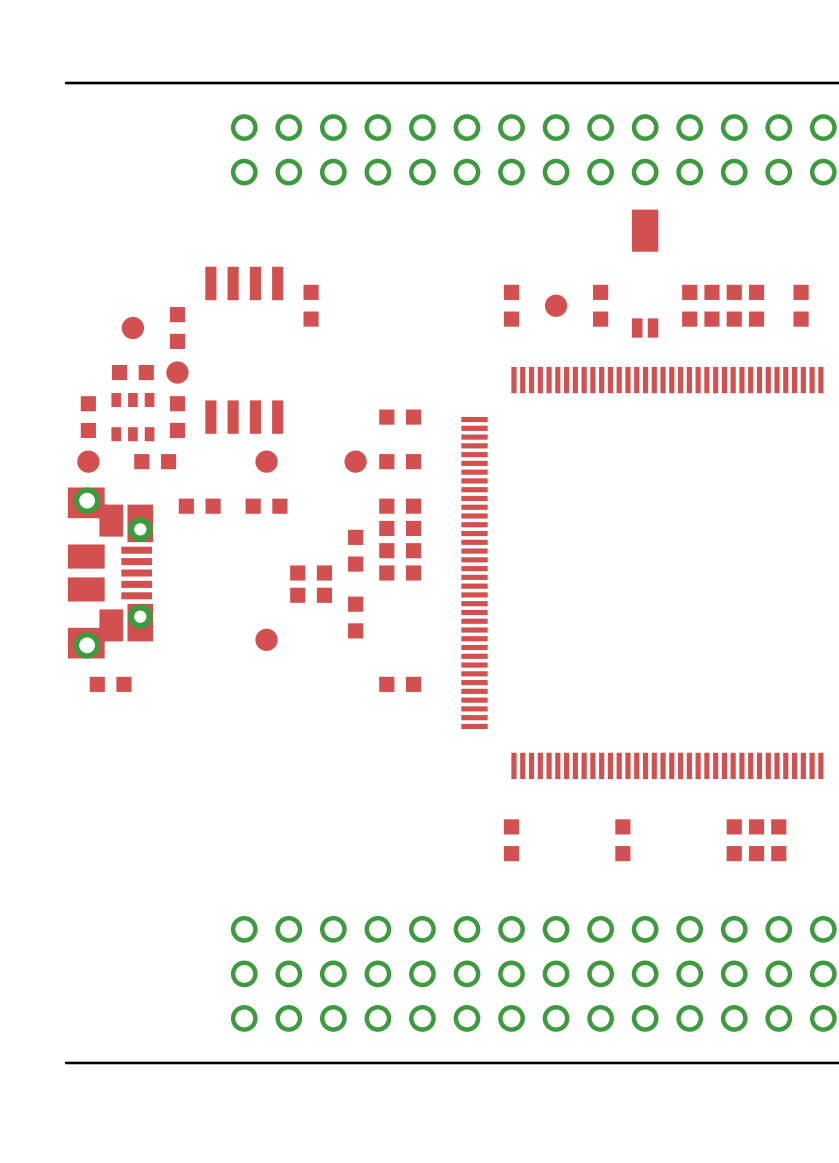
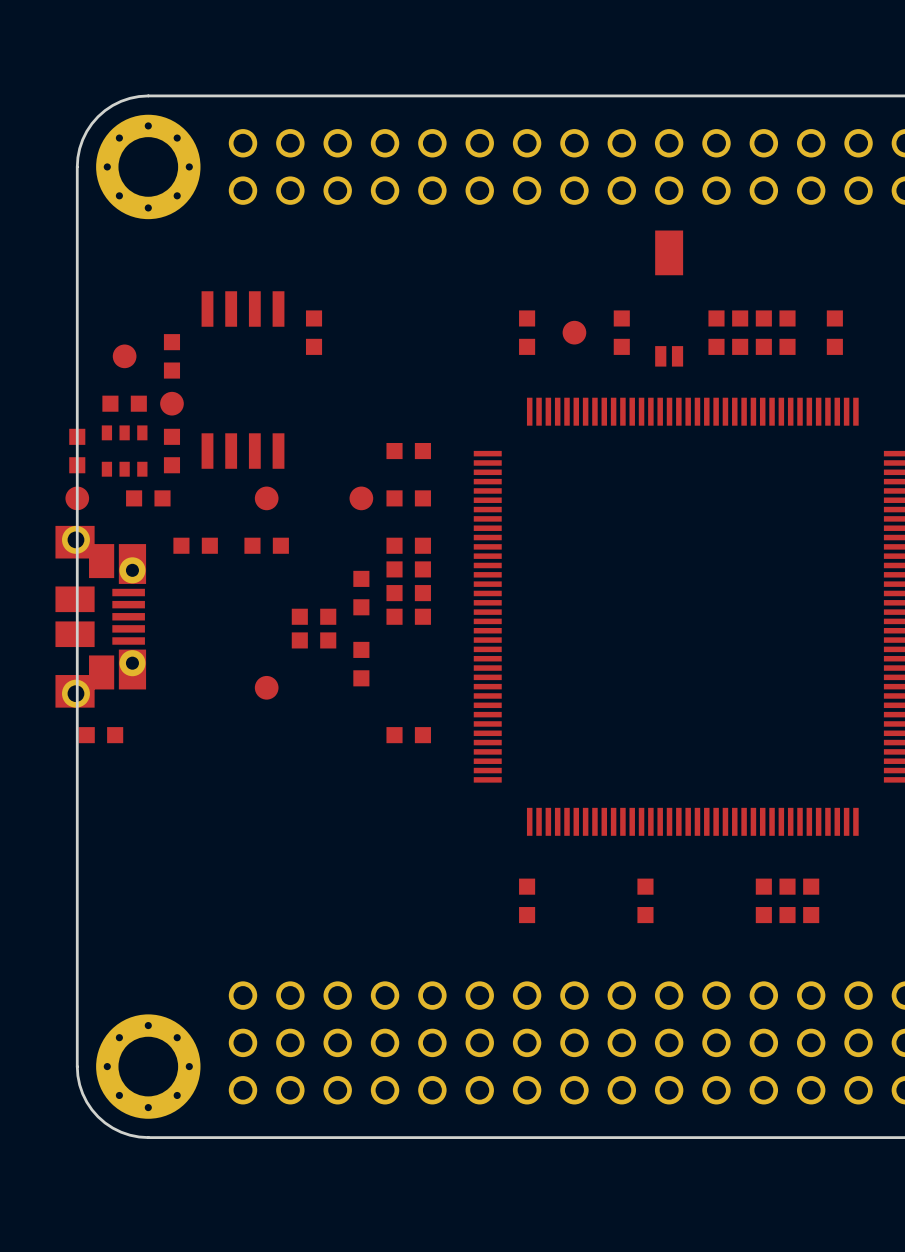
board edge: (155, 83) (66, 83) -> (148, 95) (121, 101) (98, 116) (82, 139) (77, 166) (77, 1075) (86, 1102) (98, 1116) (121, 1132) (148, 1137)
part: none -> (148, 166)
part: none -> (148, 1066)
board edge: (155, 1062) (66, 1062) -> none

